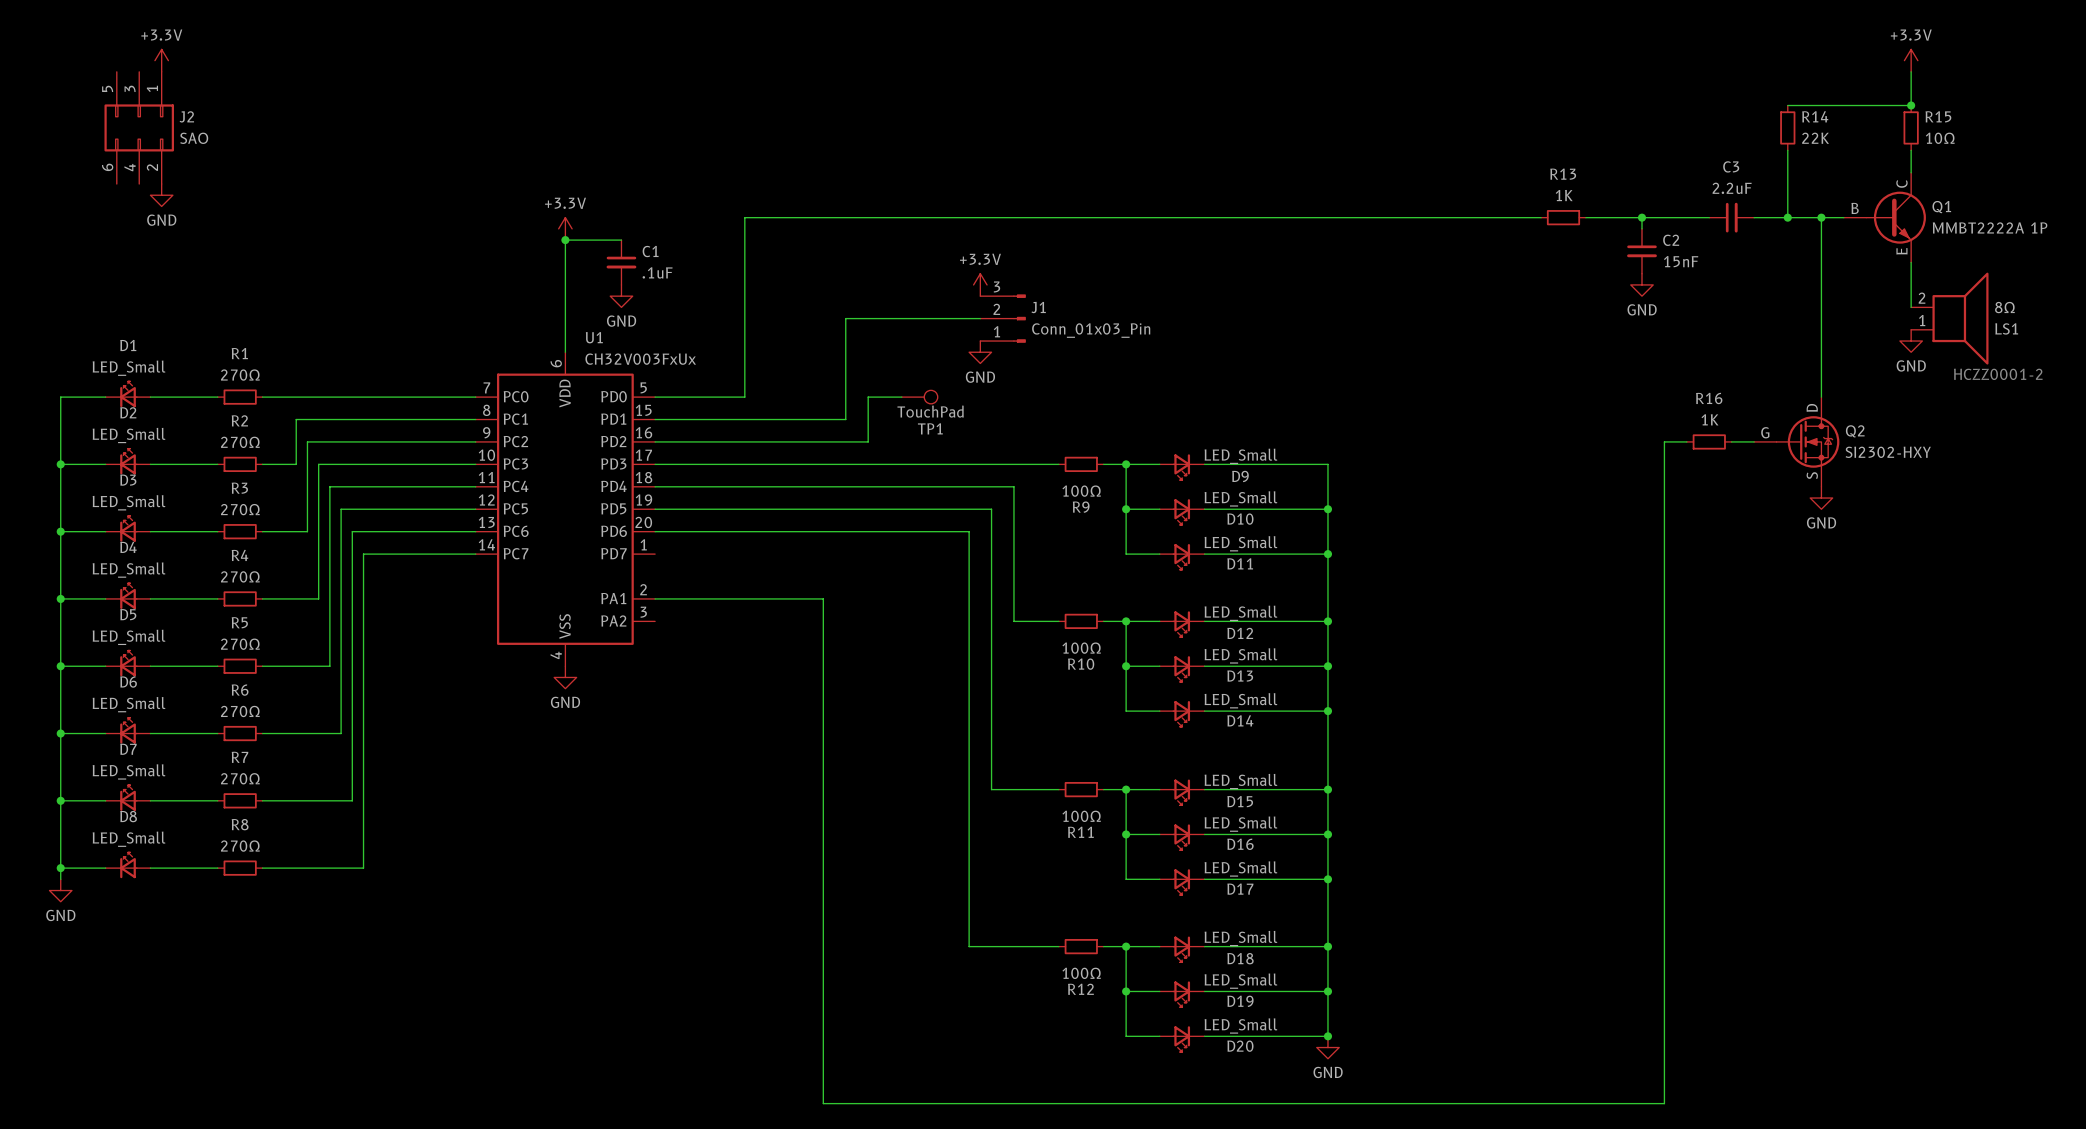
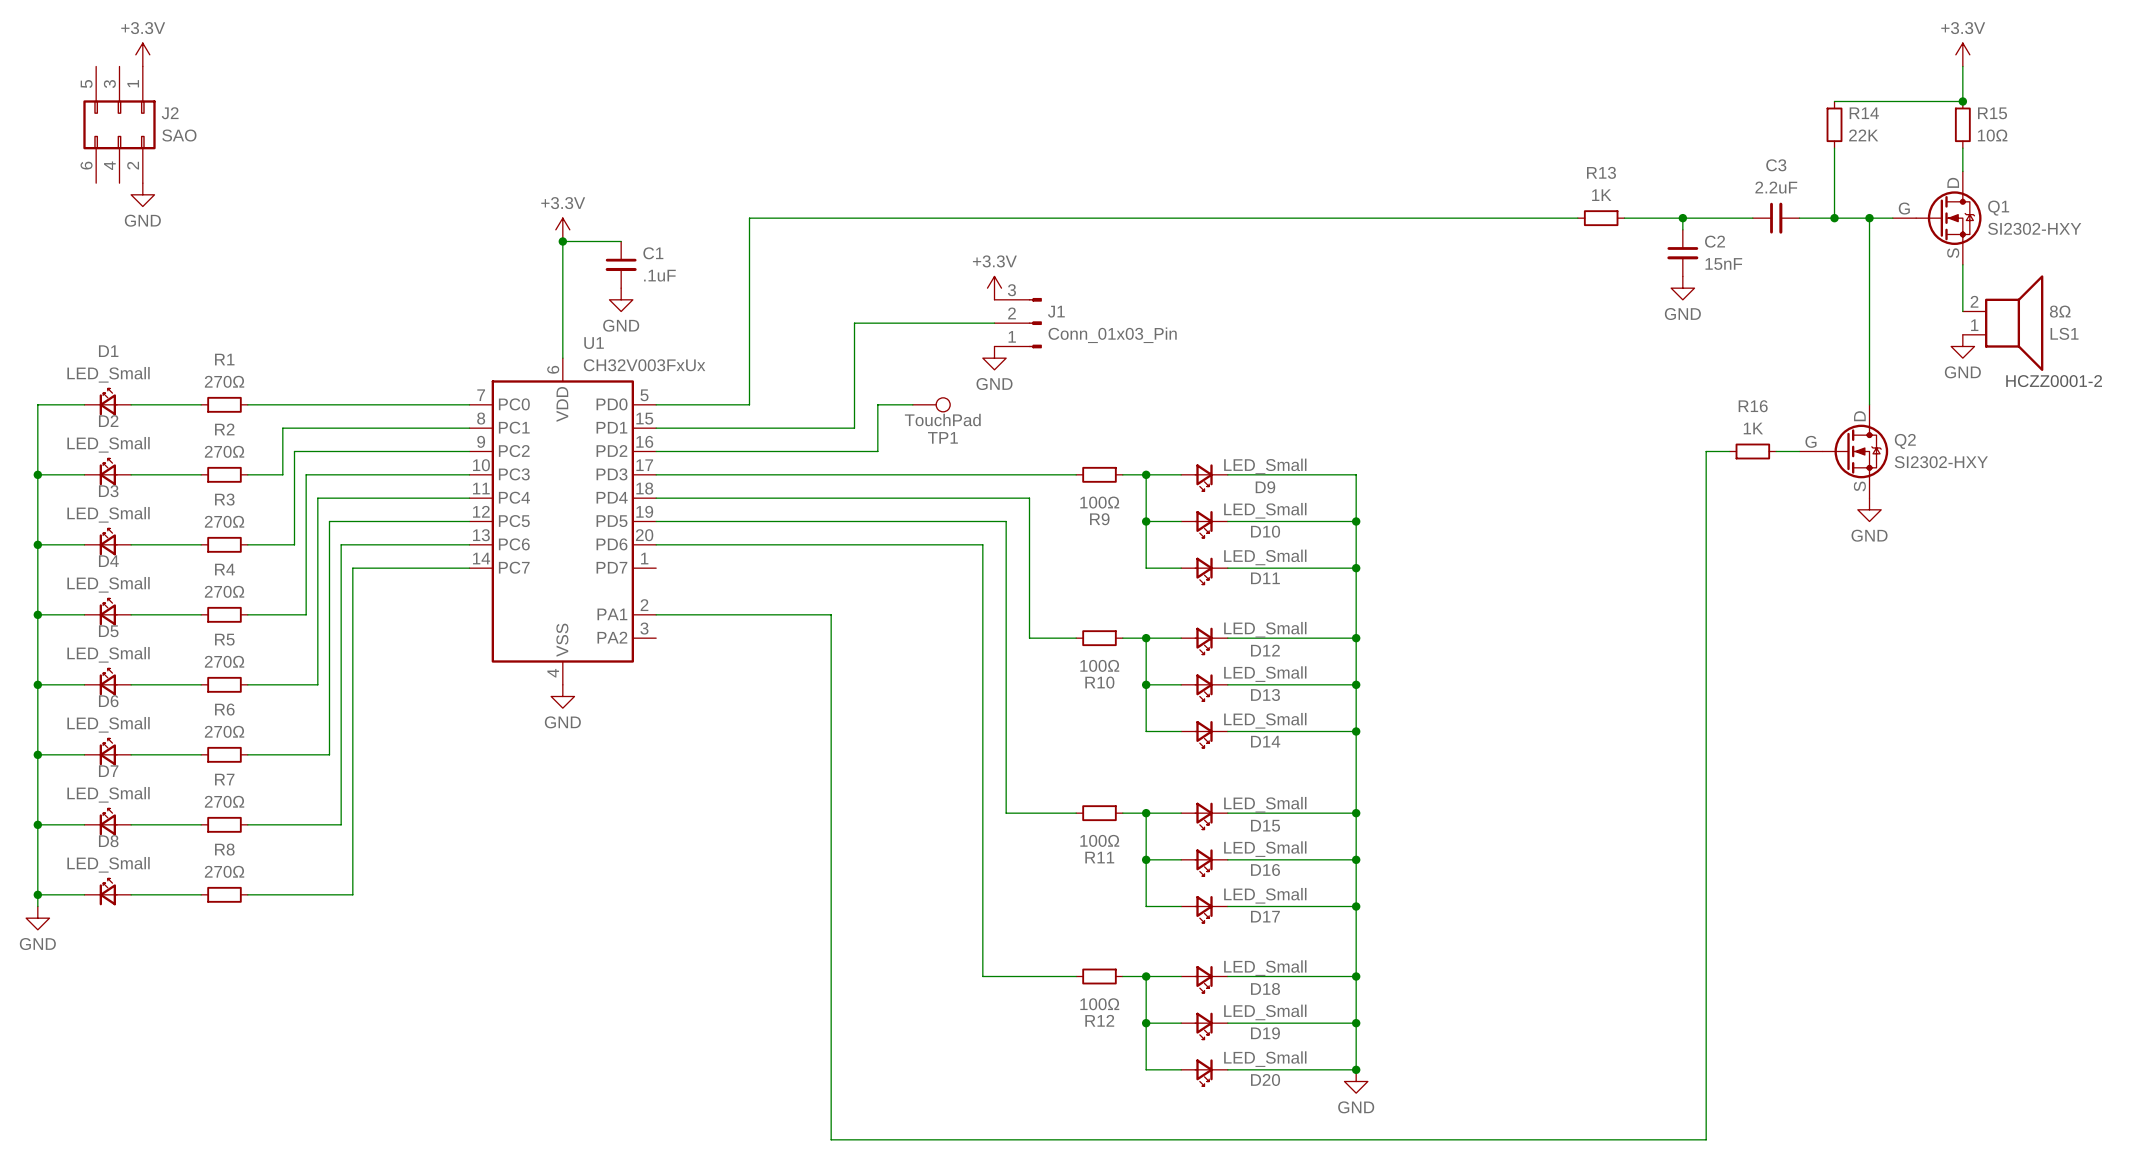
Q1 symbol: [1843, 172, 1926, 263] -> [1892, 171, 1982, 265]
Q1 value: MMBT2222A 1P (1990, 227) -> SI2302-HXY (2034, 228)

